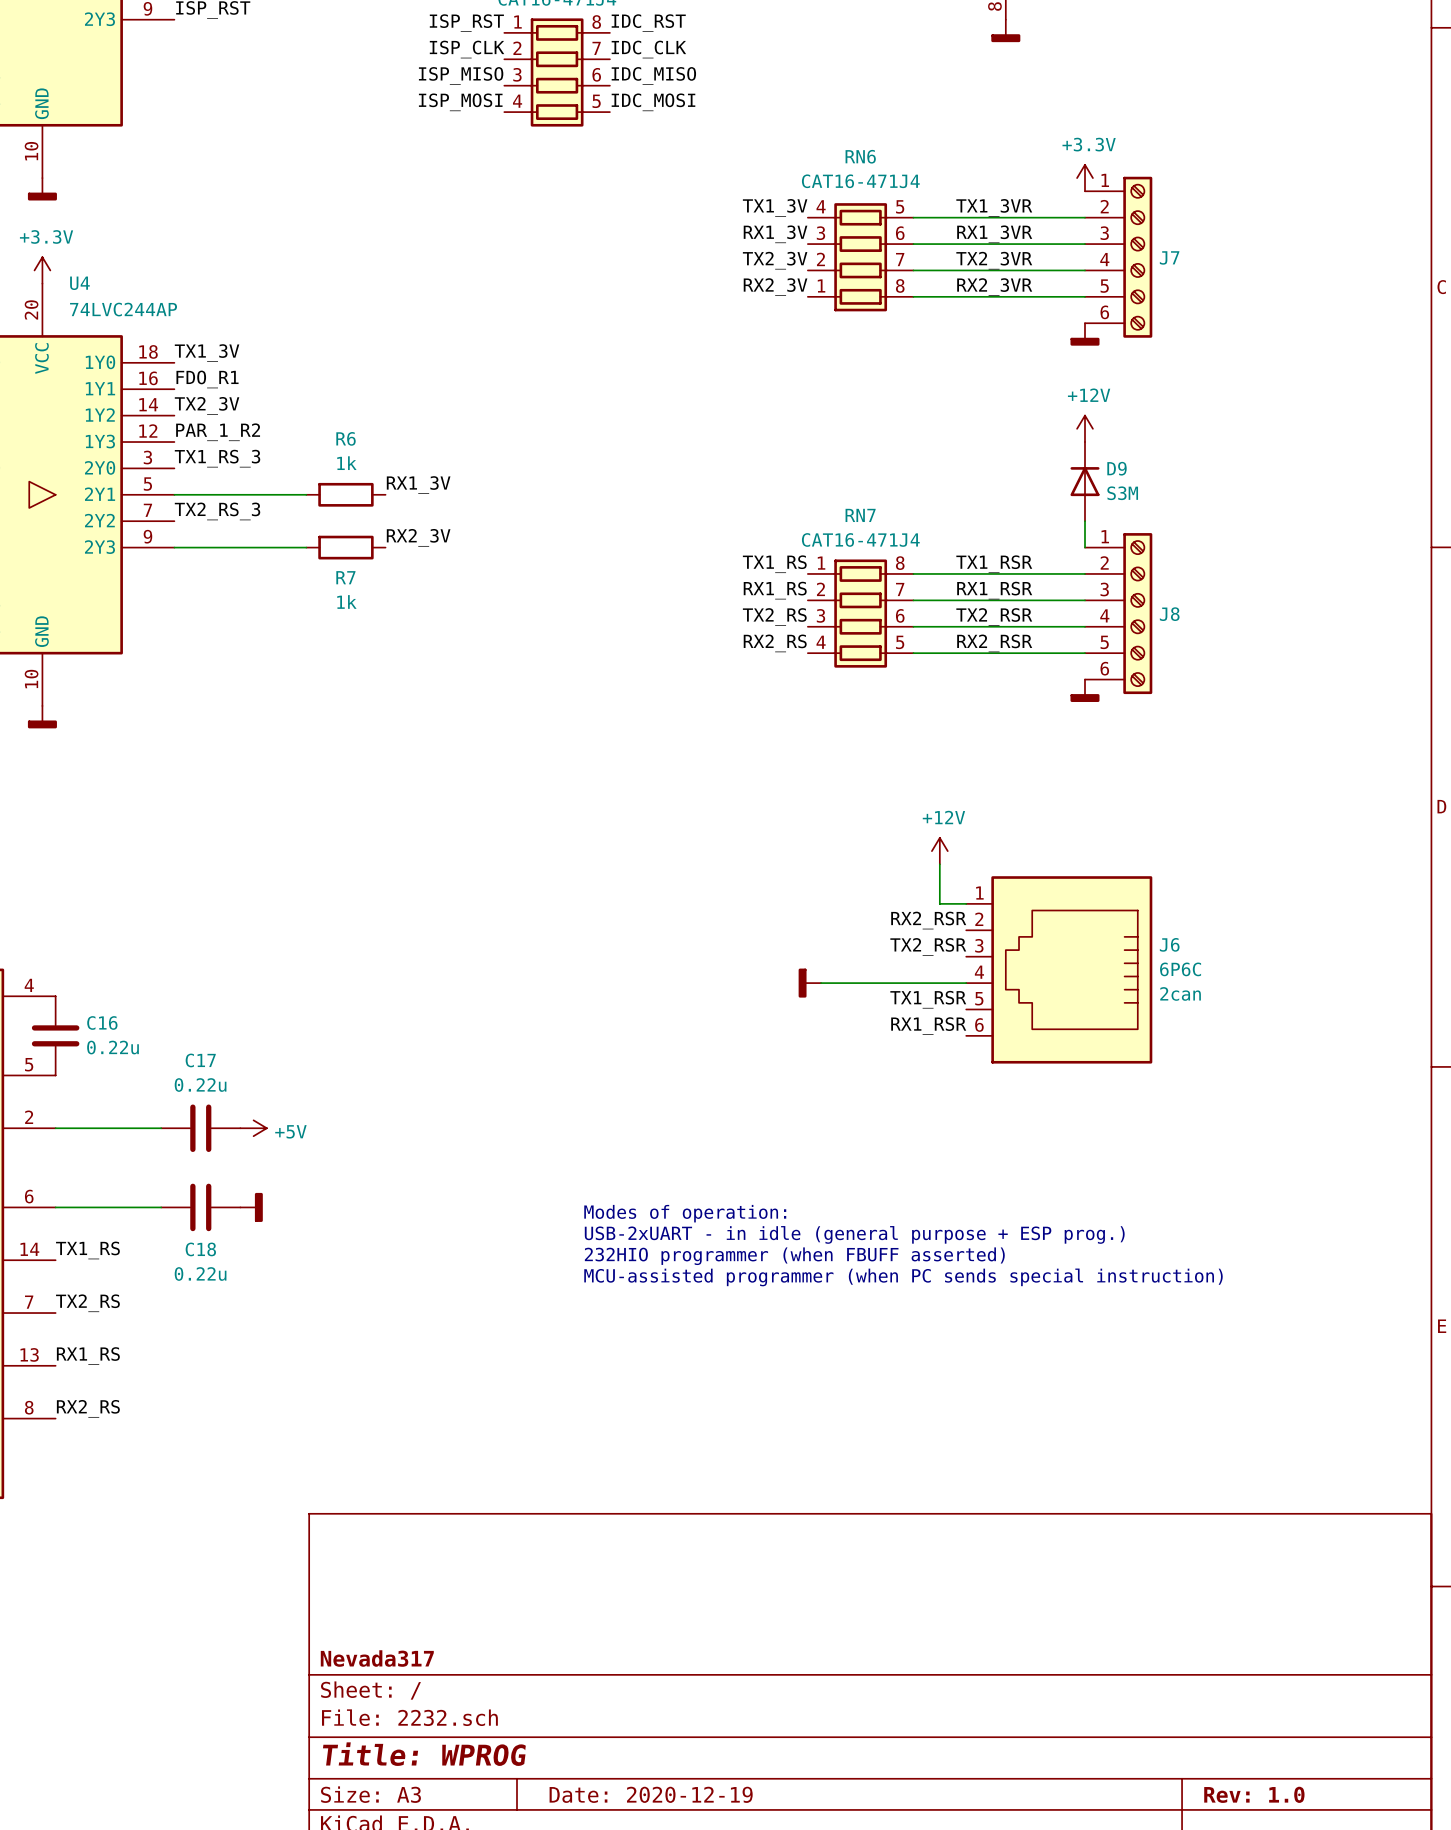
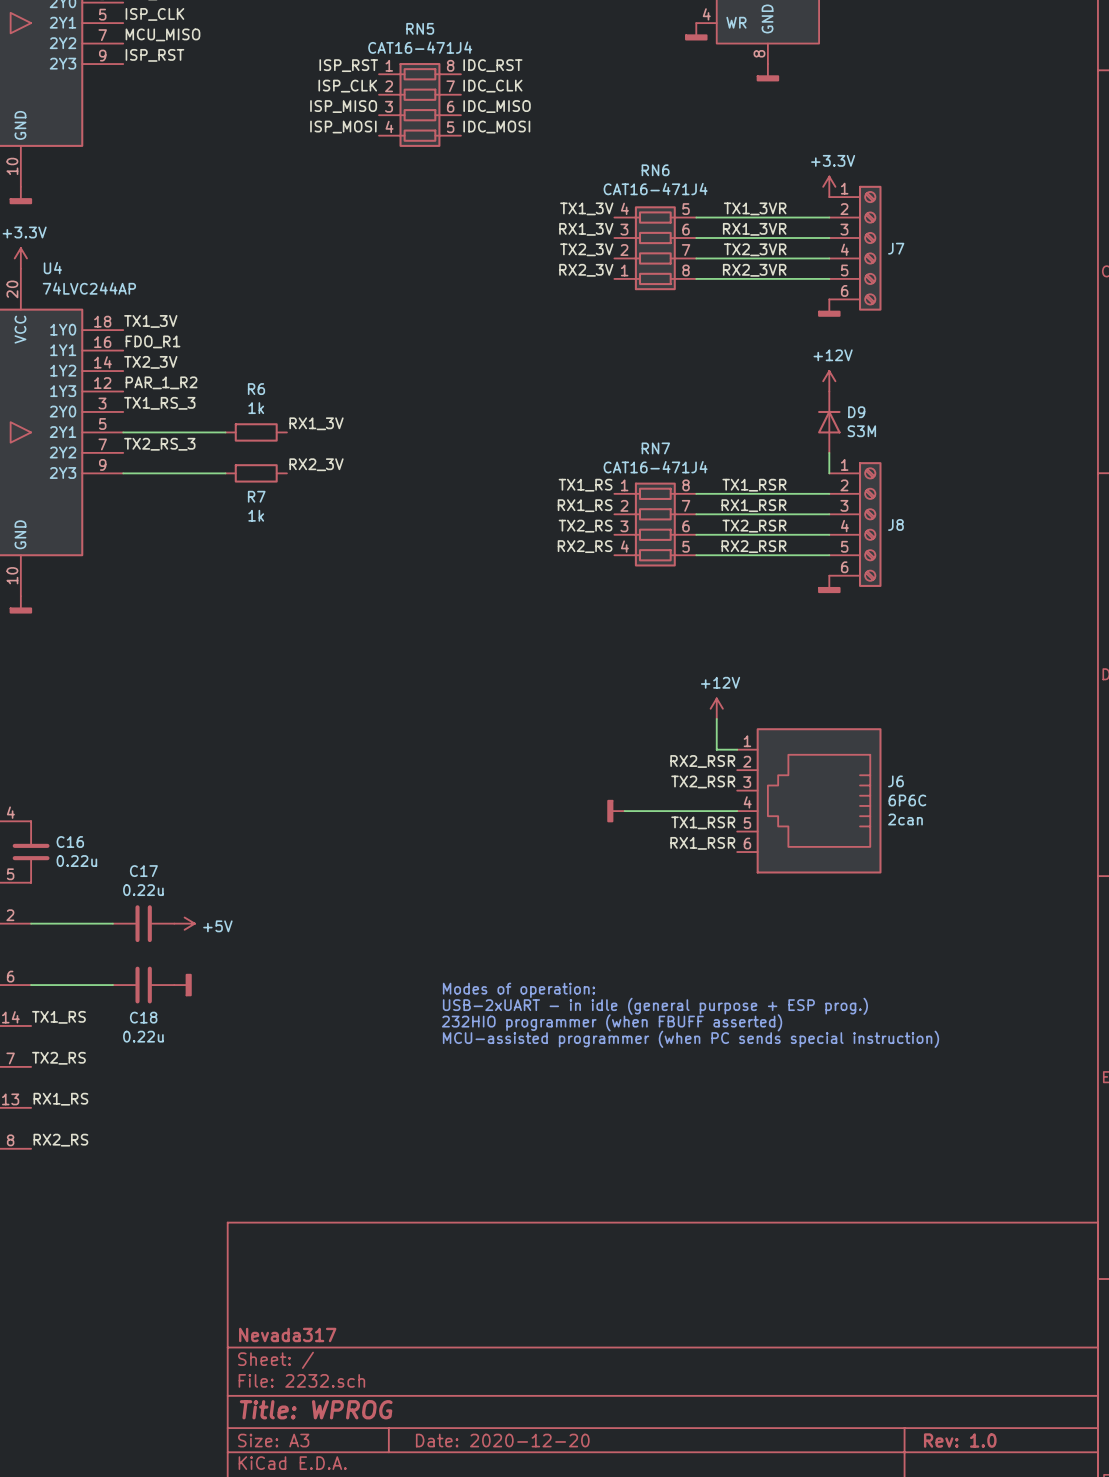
title block: Date: 2020-12-19 (651, 1794) -> Date: 2020-12-20 (502, 1440)

